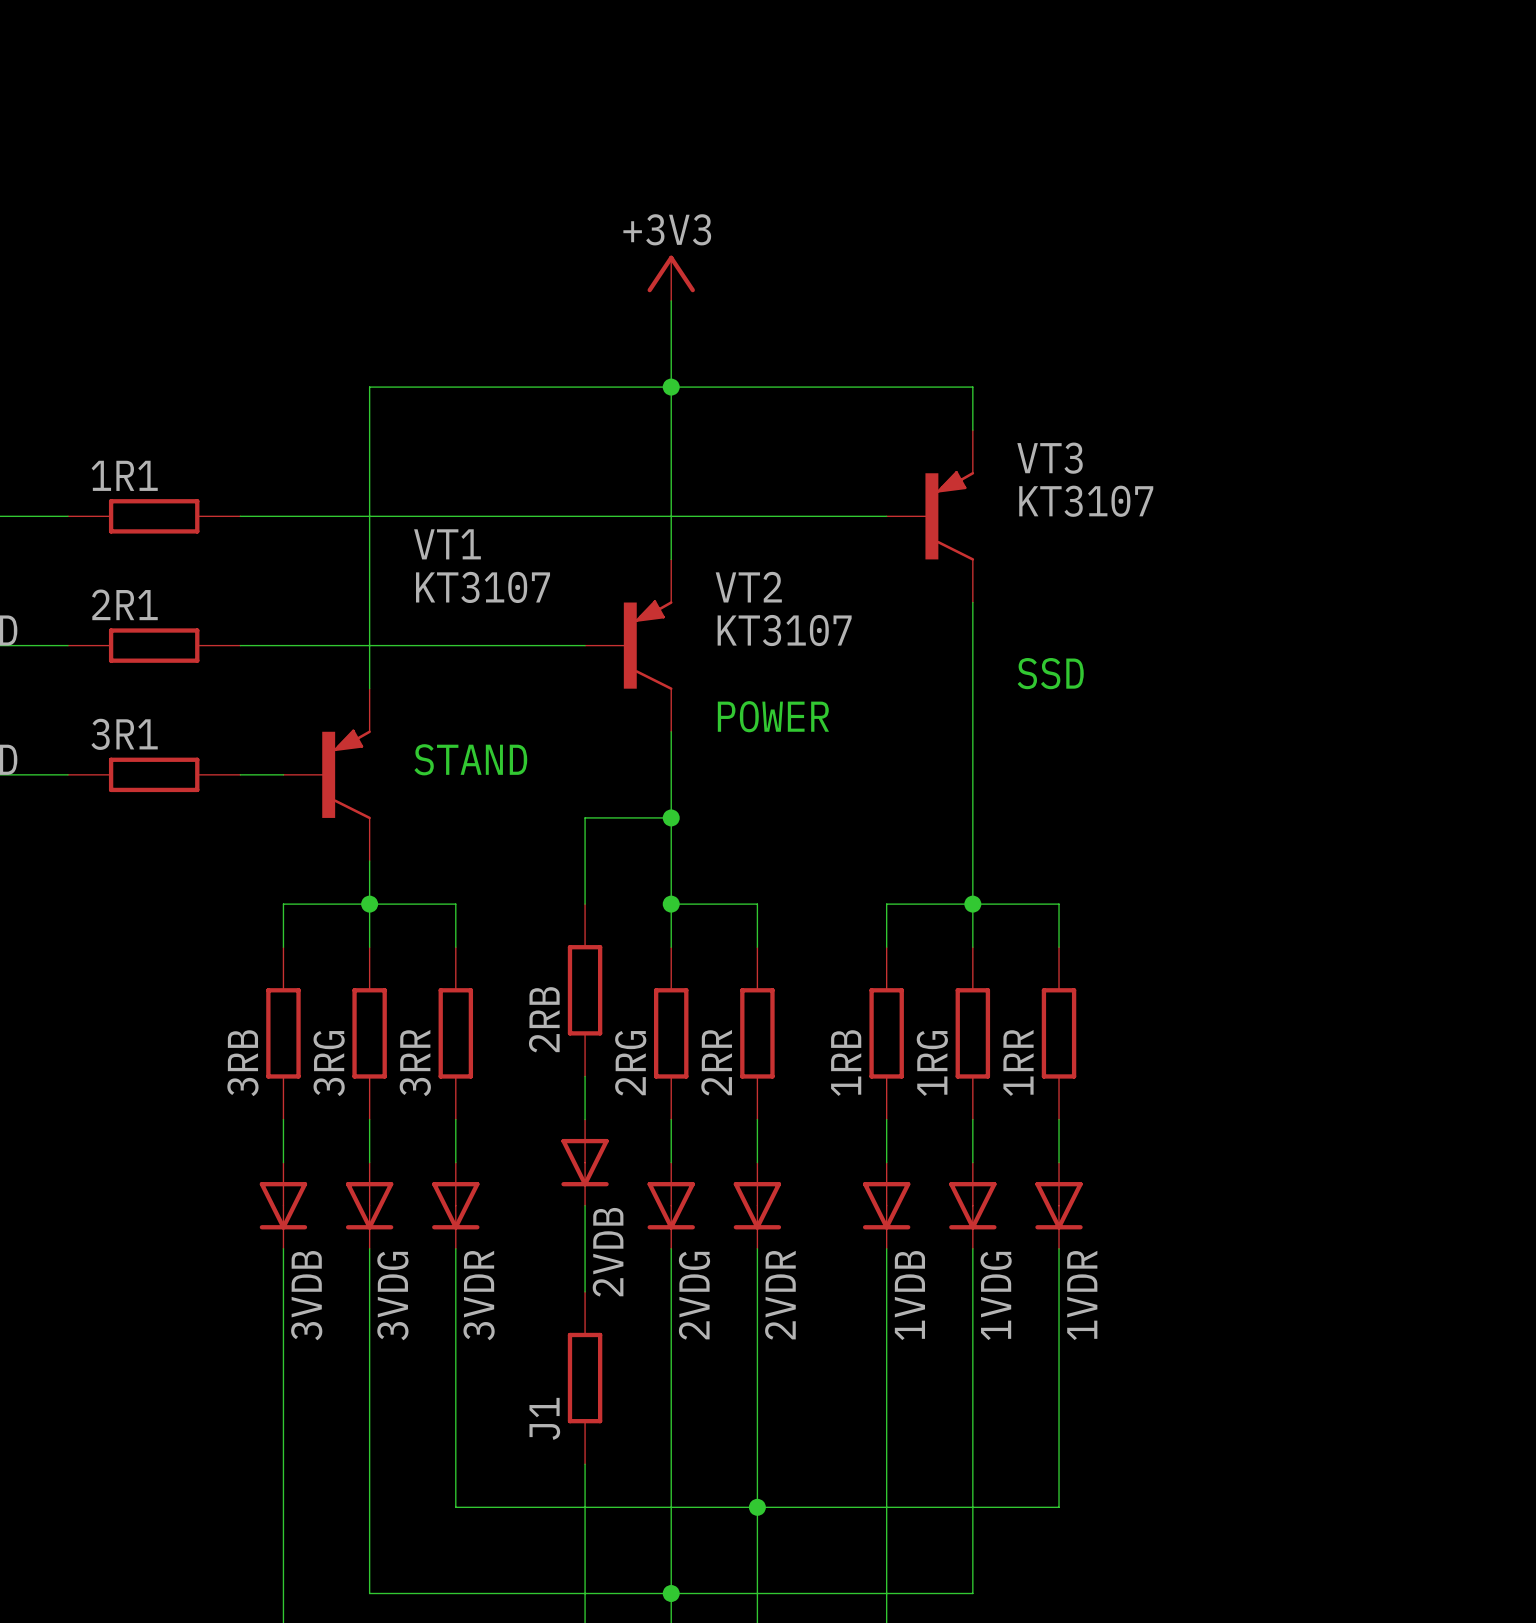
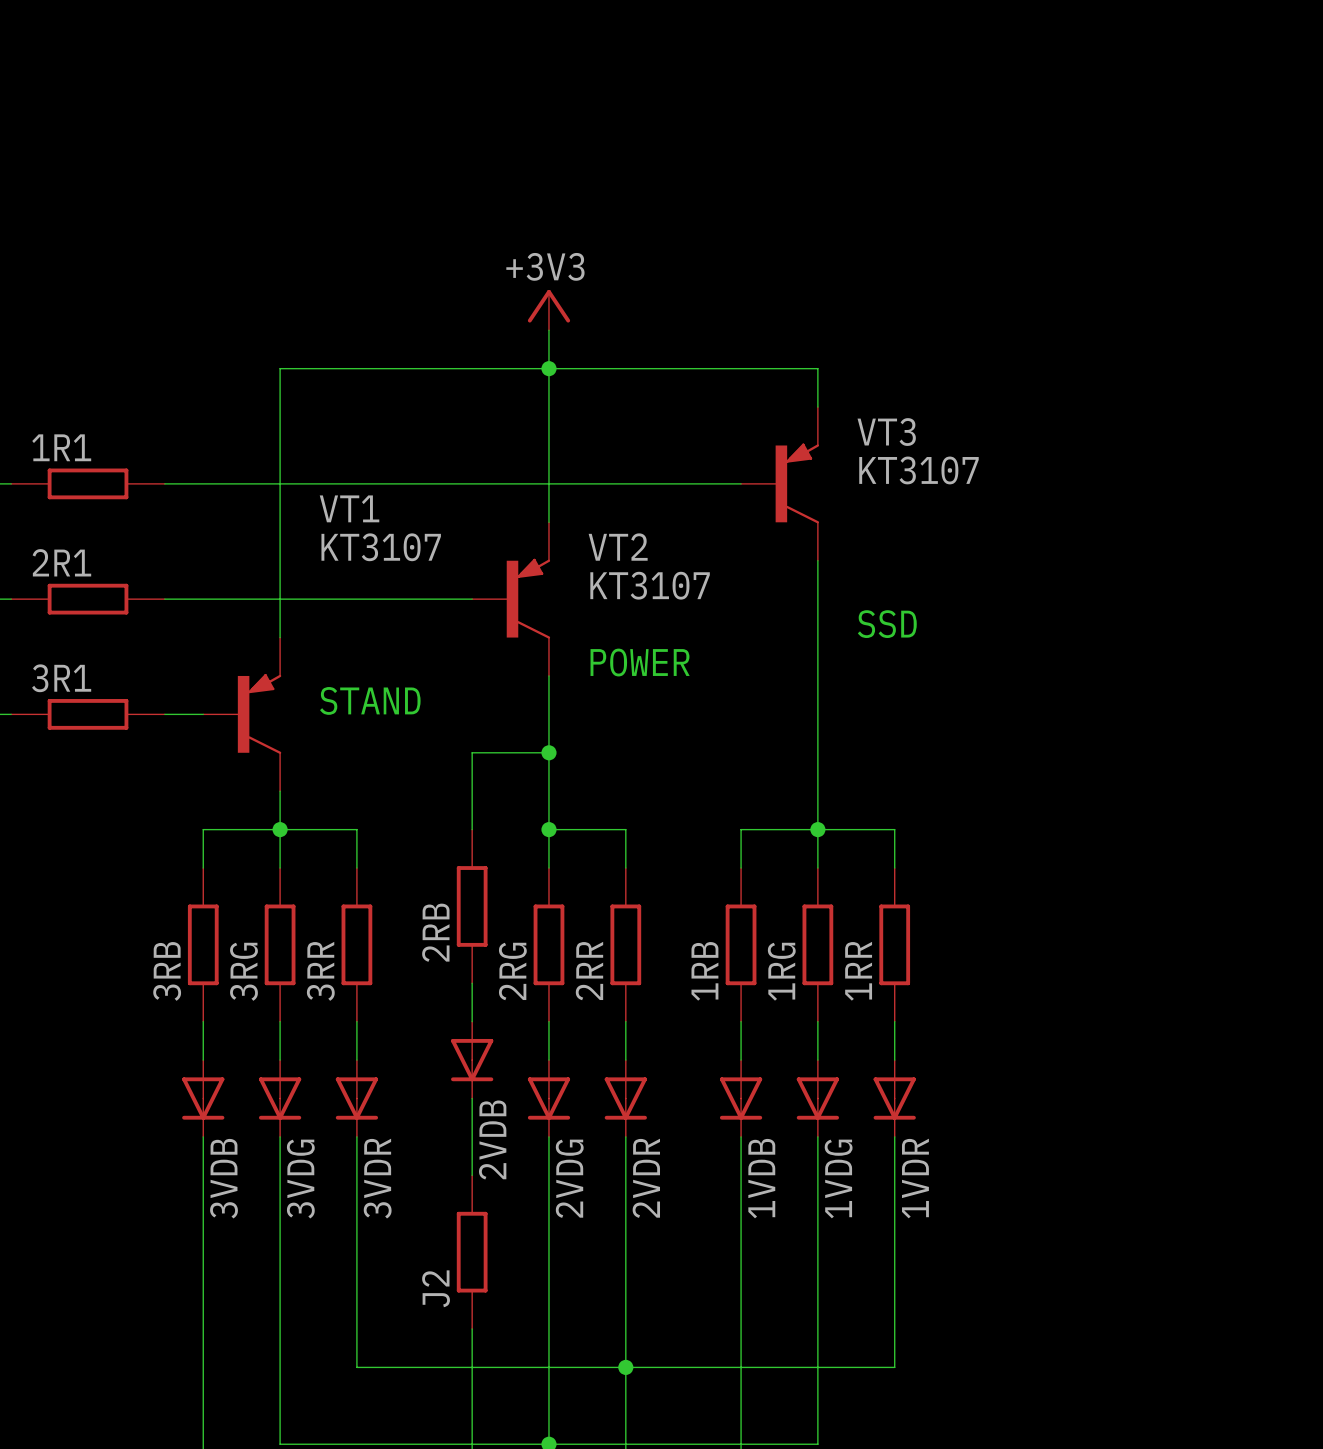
power symbol position: +3V3 (671, 278) -> +3V3 (548, 310)
J1 name: J1 (544, 1418) -> J2 (436, 1288)

